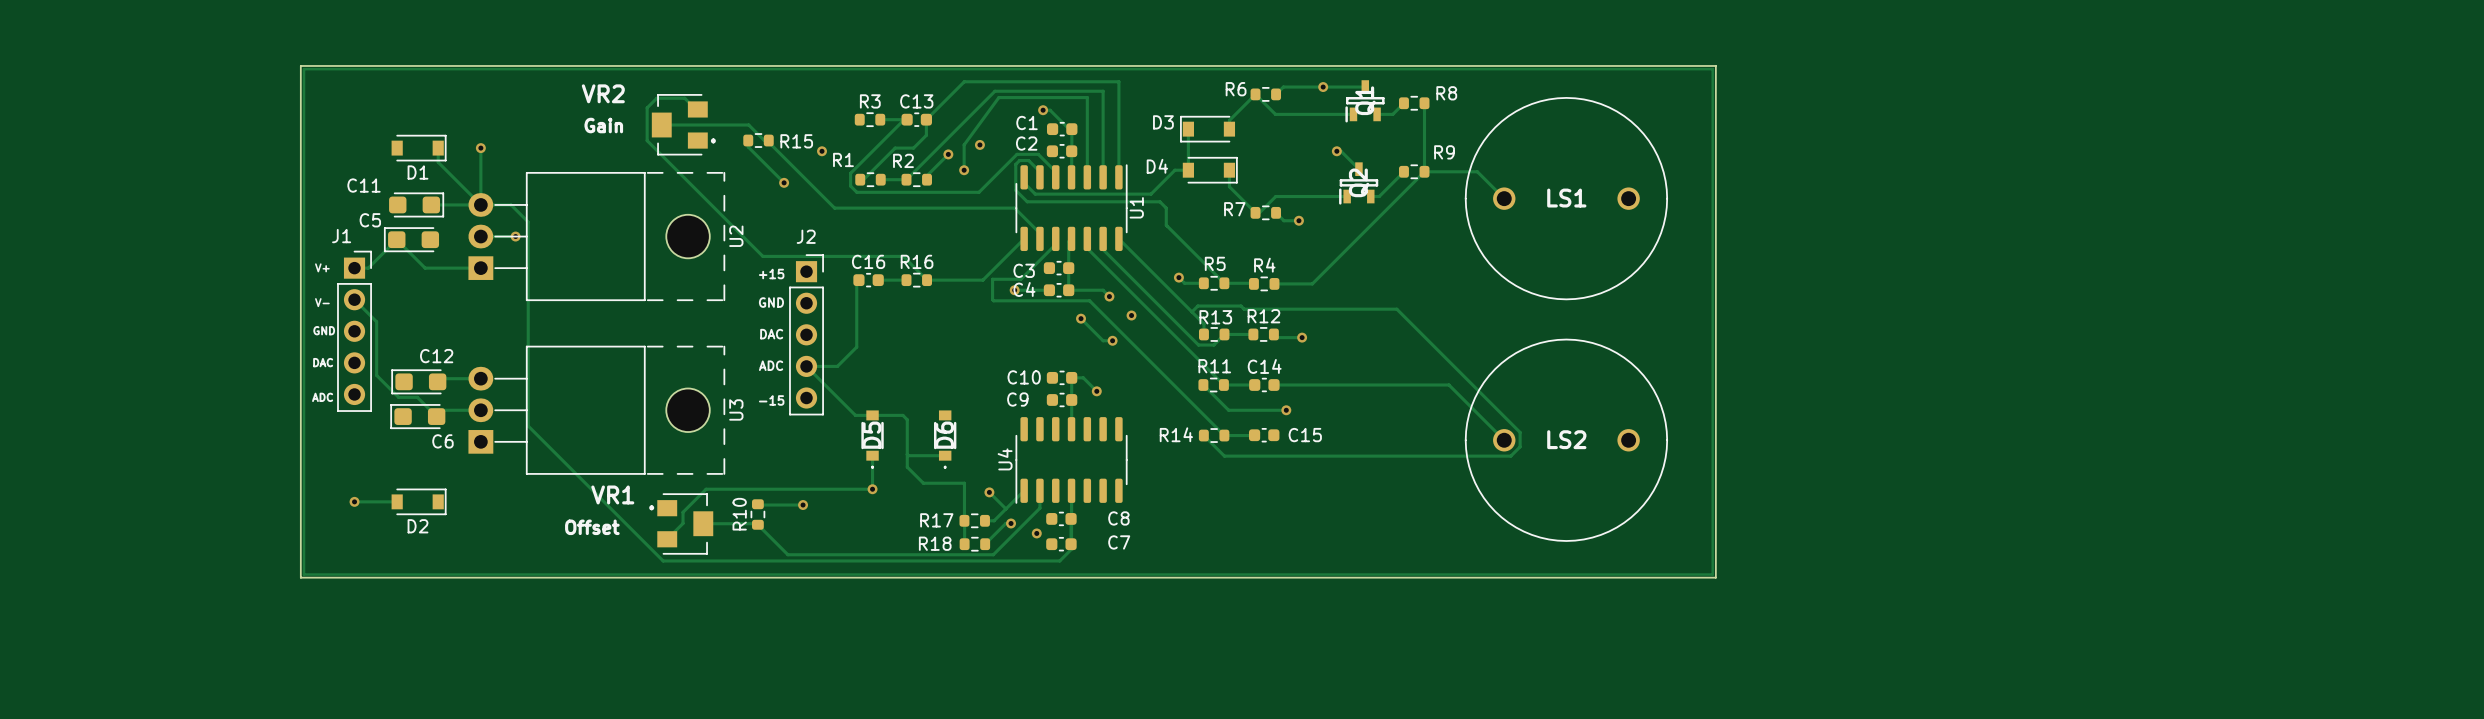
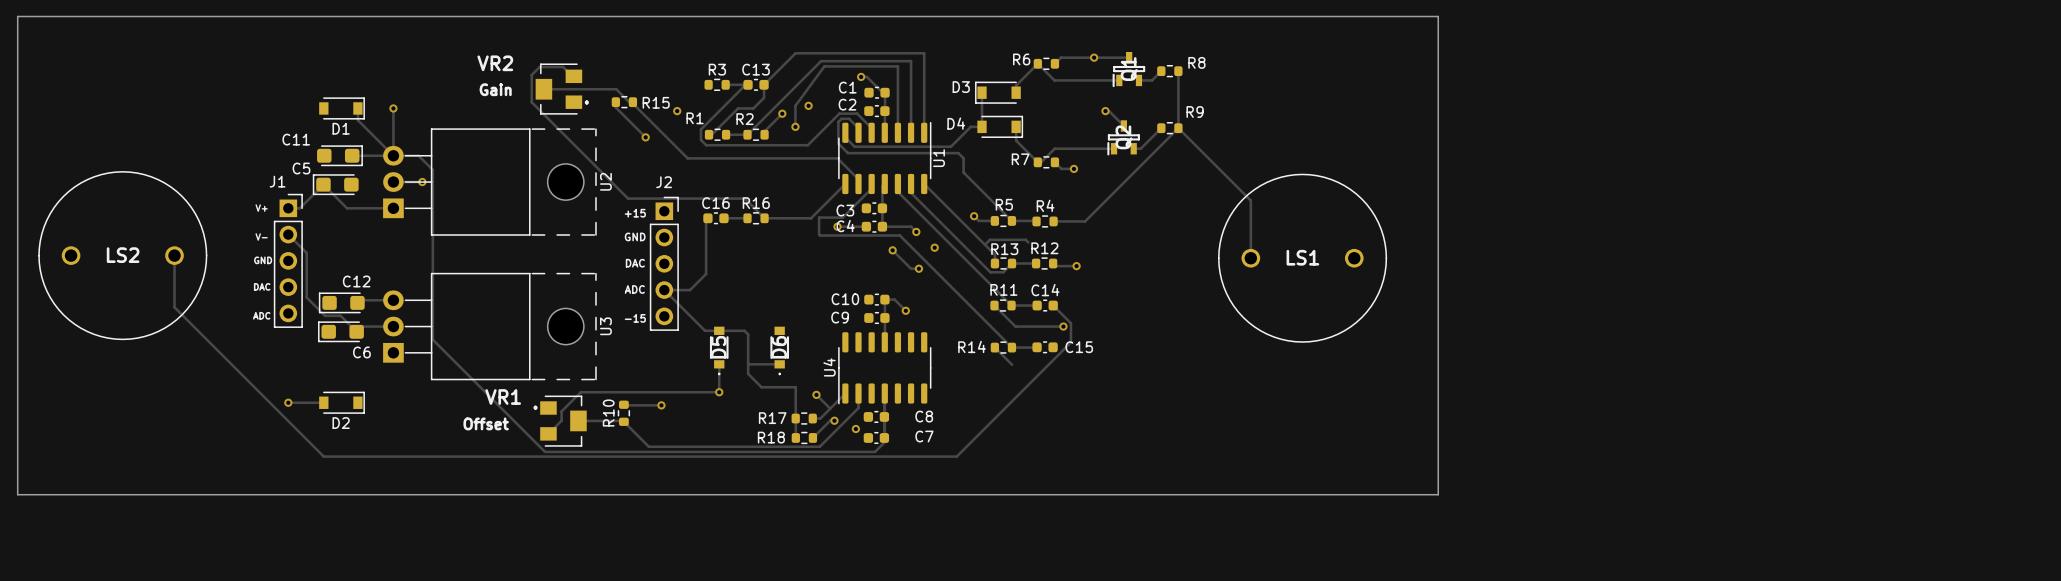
board edge: (300, 65) (1715, 65) (1715, 577) (300, 577) (300, 65) -> (17, 16) (17, 494) (1438, 494) (1438, 16) (17, 16)
track: (303, 69) (1712, 69) (1712, 574) (303, 574) (303, 69) -> none
track: (1424, 171) (1477, 171) (1504, 198) -> (1178, 128) (1250, 200) (1250, 258)
LS1 position: (1566, 198) -> (1302, 258)
track: (1244, 309) (1396, 309) (1520, 432) (1520, 446) (1510, 456) (1224, 456) -> none
track: (1274, 384) (1448, 384) (1504, 440) -> (1053, 305) (1070, 323) (1070, 342) (956, 456) (323, 456) (174, 307) (174, 255)
LS2 position: (1566, 440) -> (122, 255)

